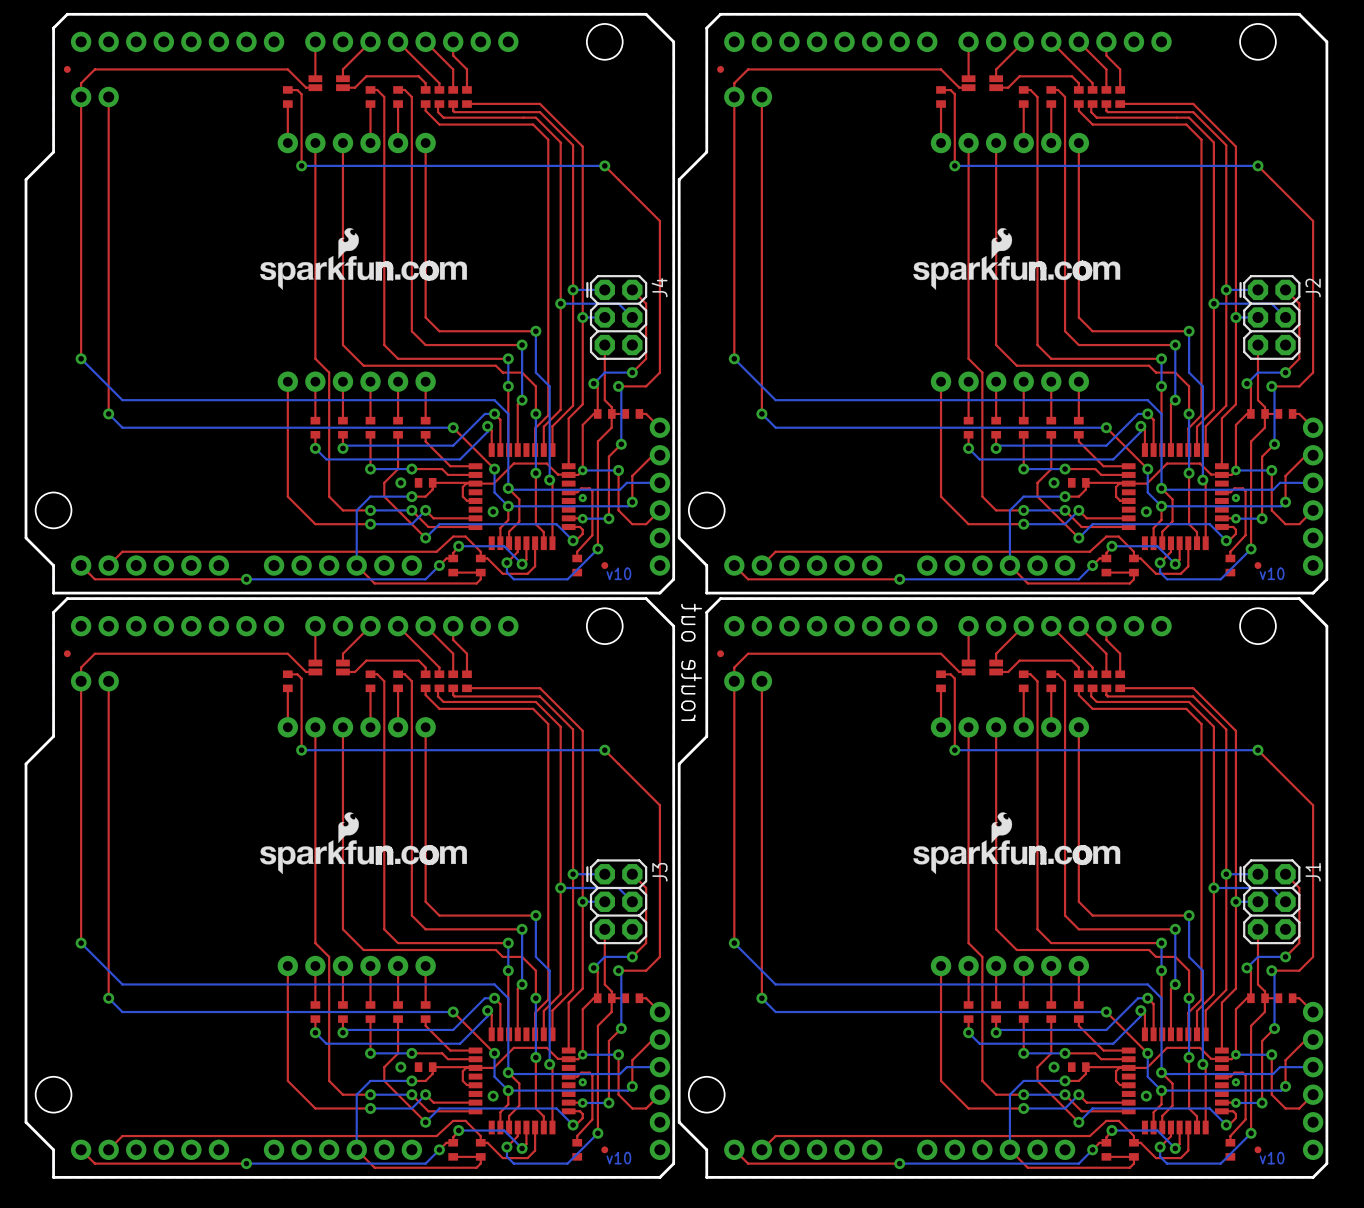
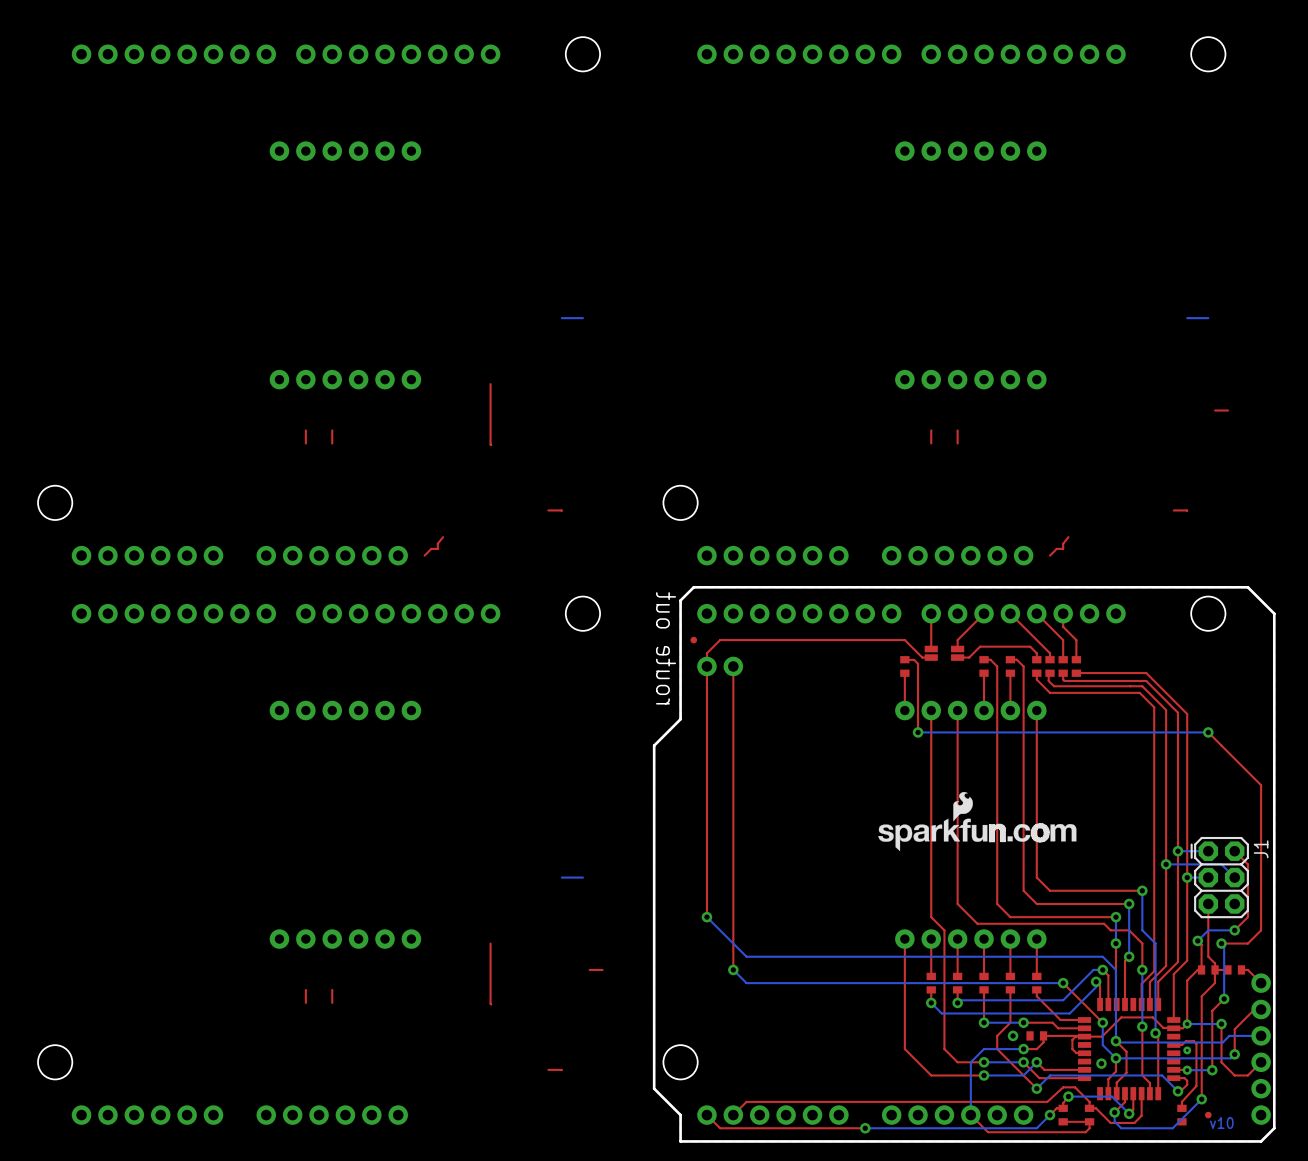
board edge: (646, 14) (67, 14) (53, 28) (53, 152) (26, 179) (26, 537) (53, 565) (53, 593) (659, 593) (673, 579) (673, 41) (646, 14) -> none
board edge: (1299, 14) (1326, 41) (1326, 579) (1313, 593) (706, 593) (706, 565) (679, 537) (679, 179) (706, 152) (706, 28) (720, 14) (1299, 14) -> none
top track: (315, 41) (315, 78) -> none
top track: (370, 41) (342, 69) (342, 78) -> none
top track: (398, 41) (439, 83) (439, 89) -> none
top track: (425, 41) (453, 69) (453, 89) -> none
top track: (453, 41) (453, 55) (466, 69) (466, 89) -> none
top track: (968, 41) (968, 78) -> none
top track: (1023, 41) (996, 69) (996, 78) -> none
top track: (1051, 41) (1092, 83) (1092, 89) -> none
top track: (1078, 41) (1106, 69) (1106, 89) -> none
top track: (1106, 41) (1106, 55) (1120, 69) (1120, 89) -> none
part: (67, 69) -> none
part: (720, 69) -> none
part: (315, 83) -> none
part: (342, 83) -> none
part: (968, 83) -> none
part: (996, 83) -> none
top track: (315, 87) (306, 87) (287, 69) (94, 69) (81, 83) (81, 358) -> none
top track: (342, 87) (355, 87) (366, 76) (418, 76) (425, 83) (425, 89) -> none
top track: (968, 87) (959, 87) (941, 69) (748, 69) (734, 83) (734, 358) -> none
top track: (996, 87) (1008, 87) (1019, 76) (1071, 76) (1078, 83) (1078, 89) -> none
top track: (287, 89) (297, 90) (301, 94) (301, 165) -> none
top track: (370, 89) (377, 89) (384, 96) (384, 345) (398, 358) (508, 358) -> none
top track: (398, 89) (404, 89) (411, 96) (411, 331) (425, 345) (522, 345) -> none
top track: (941, 89) (950, 90) (954, 94) (954, 165) -> none
top track: (1023, 89) (1030, 89) (1037, 96) (1037, 345) (1051, 358) (1161, 358) -> none
top track: (1051, 89) (1058, 89) (1065, 96) (1065, 331) (1078, 345) (1175, 345) -> none
part: (94, 96) -> none
top track: (108, 96) (108, 413) -> none
part: (287, 96) -> none
part: (370, 96) -> none
part: (398, 96) -> none
part: (425, 96) -> none
part: (439, 96) -> none
part: (453, 96) -> none
part: (466, 96) -> none
part: (748, 96) -> none
top track: (761, 96) (761, 413) -> none
part: (941, 96) -> none
part: (1023, 96) -> none
part: (1051, 96) -> none
part: (1078, 96) -> none
part: (1092, 96) -> none
part: (1106, 96) -> none
part: (1120, 96) -> none
top track: (287, 104) (287, 143) -> none
top track: (370, 104) (370, 143) -> none
top track: (398, 104) (398, 143) -> none
top track: (425, 104) (425, 110) (439, 124) (533, 124) (548, 139) (548, 415) (535, 428) (535, 450) -> none
top track: (439, 104) (438, 112) (443, 117) (535, 117) (560, 142) (560, 409) (543, 426) (543, 450) -> none
top track: (453, 104) (454, 112) (540, 112) (573, 145) (573, 405) (552, 426) (552, 450) -> none
top track: (466, 104) (540, 103) (582, 146) (582, 404) (568, 418) (568, 466) -> none
top track: (941, 104) (941, 143) -> none
top track: (1023, 104) (1023, 143) -> none
top track: (1051, 104) (1051, 143) -> none
top track: (1078, 104) (1078, 110) (1092, 124) (1186, 124) (1201, 139) (1201, 415) (1188, 428) (1188, 450) -> none
top track: (1092, 104) (1091, 112) (1096, 117) (1189, 117) (1213, 142) (1213, 409) (1197, 426) (1197, 450) -> none
top track: (1106, 104) (1107, 112) (1193, 112) (1226, 145) (1226, 405) (1205, 426) (1205, 450) -> none
top track: (1120, 104) (1193, 103) (1235, 146) (1235, 404) (1221, 418) (1221, 466) -> none
top track: (315, 143) (315, 358) (329, 372) (329, 496) (342, 510) (370, 510) -> none
top track: (342, 143) (342, 345) (363, 365) (495, 365) (502, 372) (522, 372) (535, 386) (535, 413) -> none
top track: (425, 143) (425, 317) (439, 331) (535, 331) -> none
top track: (968, 143) (968, 358) (982, 372) (982, 496) (996, 510) (1023, 510) -> none
top track: (996, 143) (996, 345) (1016, 365) (1149, 365) (1156, 372) (1175, 372) (1189, 386) (1189, 413) -> none
top track: (1078, 143) (1078, 317) (1092, 331) (1189, 331) -> none
via: (301, 165) -> none
top track: (604, 165) (659, 221) (659, 372) (646, 386) (618, 386) -> none
bottom track: (604, 165) (301, 165) -> none
via: (604, 165) -> none
via: (954, 165) -> none
top track: (1257, 165) (1313, 221) (1313, 372) (1299, 386) (1271, 386) -> none
bottom track: (1257, 165) (954, 165) -> none
via: (1257, 165) -> none
drawing: [260, 228, 467, 290] -> none
drawing: [913, 228, 1121, 290] -> none
via: (573, 289) -> none
bottom track: (604, 289) (573, 289) -> none
top track: (632, 289) (646, 303) (646, 358) (632, 372) -> none
via: (1226, 289) -> none
bottom track: (1257, 289) (1226, 289) -> none
top track: (1285, 289) (1299, 303) (1299, 358) (1285, 372) -> none
bottom track: (560, 303) (618, 303) (632, 317) -> none
via: (560, 303) -> none
bottom track: (1213, 303) (1271, 303) (1285, 317) -> none
via: (1213, 303) -> none
via: (582, 317) -> none
J4: (616, 317) -> none
via: (1235, 317) -> none
J2: (1269, 317) -> none
bottom track: (535, 331) (535, 372) (549, 386) (549, 480) -> none
via: (535, 331) -> none
bottom track: (1189, 331) (1189, 372) (1202, 386) (1202, 480) -> none
via: (1189, 331) -> none
bottom track: (522, 345) (522, 400) -> none
via: (522, 345) -> none
top track: (604, 345) (604, 400) (611, 407) (611, 413) -> none
bottom track: (1175, 345) (1175, 400) -> none
via: (1175, 345) -> none
top track: (1257, 345) (1257, 400) (1265, 407) (1264, 427) (1251, 441) (1251, 548) -> none
bottom track: (81, 358) (122, 400) (494, 400) (508, 413) (509, 489) (619, 489) (626, 482) (659, 482) -> none
via: (81, 358) -> none
bottom track: (508, 358) (508, 386) -> none
via: (508, 358) -> none
bottom track: (734, 358) (775, 400) (1147, 400) (1161, 413) (1162, 489) (1273, 489) (1280, 482) (1313, 482) -> none
via: (734, 358) -> none
bottom track: (1161, 358) (1161, 386) -> none
via: (1161, 358) -> none
bottom track: (632, 372) (604, 372) (593, 383) -> none
via: (632, 372) -> none
bottom track: (1285, 372) (1257, 372) (1246, 383) -> none
via: (1285, 372) -> none
top track: (287, 381) (287, 496) (315, 524) (370, 524) -> none
top track: (315, 381) (315, 420) -> none
top track: (342, 381) (342, 420) -> none
top track: (370, 381) (370, 420) -> none
top track: (398, 381) (398, 420) -> none
top track: (425, 381) (425, 420) -> none
top track: (941, 381) (941, 496) (968, 524) (1023, 524) -> none
top track: (968, 381) (968, 420) -> none
top track: (996, 381) (996, 420) -> none
top track: (1023, 381) (1023, 420) -> none
top track: (1051, 381) (1051, 420) -> none
top track: (1078, 381) (1078, 420) -> none
top track: (593, 383) (597, 387) (597, 413) (593, 413) (582, 424) (582, 470) (578, 474) (557, 474) (546, 463) (513, 463) (493, 483) (466, 483) (462, 486) (462, 496) (466, 500) (475, 500) -> none
via: (593, 383) -> none
top track: (1246, 383) (1250, 387) (1250, 413) (1246, 413) (1235, 424) (1235, 470) (1231, 474) (1211, 474) (1200, 463) (1167, 463) (1146, 483) (1119, 483) (1116, 486) (1116, 496) (1120, 500) (1128, 500) -> none
via: (1246, 383) -> none
via: (508, 386) -> none
bottom track: (618, 386) (621, 389) (621, 444) -> none
via: (618, 386) -> none
top track: (1161, 386) (1162, 450) -> none
via: (1161, 386) -> none
bottom track: (1271, 386) (1274, 389) (1274, 444) -> none
via: (1271, 386) -> none
top track: (522, 400) (517, 404) (517, 450) -> none
via: (522, 400) -> none
top track: (1175, 400) (1170, 404) (1170, 450) -> none
via: (1175, 400) -> none
bottom track: (108, 413) (122, 427) (453, 427) -> none
via: (108, 413) -> none
top track: (494, 413) (500, 419) (500, 450) -> none
bottom track: (494, 413) (484, 413) (453, 445) (345, 445) (342, 448) -> none
via: (494, 413) -> none
bottom track: (535, 413) (535, 473) -> none
via: (535, 413) -> none
part: (604, 413) -> none
top track: (611, 413) (611, 427) (597, 441) (597, 548) -> none
top track: (625, 413) (611, 413) -> none
part: (632, 413) -> none
top track: (639, 413) (646, 413) (659, 427) -> none
bottom track: (761, 413) (775, 427) (1106, 427) -> none
via: (761, 413) -> none
top track: (1147, 413) (1153, 419) (1153, 450) -> none
bottom track: (1147, 413) (1138, 413) (1106, 445) (998, 445) (996, 448) -> none
via: (1147, 413) -> none
bottom track: (1189, 413) (1189, 473) -> none
via: (1189, 413) -> none
part: (1257, 413) -> none
part: (1285, 413) -> none
top track: (1292, 413) (1299, 413) (1313, 427) -> none
top track: (487, 426) (491, 430) (491, 450) -> none
bottom track: (487, 426) (487, 431) (460, 459) (326, 459) (315, 448) -> none
via: (487, 426) -> none
top track: (1140, 426) (1144, 430) (1144, 450) -> none
bottom track: (1140, 426) (1140, 431) (1113, 459) (979, 459) (968, 448) -> none
via: (1140, 426) -> none
part: (315, 427) -> none
part: (342, 427) -> none
part: (370, 427) -> none
part: (398, 427) -> none
part: (425, 427) -> none
top track: (453, 427) (494, 469) -> none
via: (453, 427) -> none
part: (968, 427) -> none
part: (996, 427) -> none
part: (1023, 427) -> none
part: (1051, 427) -> none
part: (1078, 427) -> none
top track: (1106, 427) (1147, 469) -> none
via: (1106, 427) -> none
top track: (370, 434) (370, 469) -> none
top track: (398, 434) (398, 469) (384, 482) (384, 496) (425, 537) -> none
top track: (425, 434) (425, 441) (450, 466) (475, 466) -> none
top track: (1023, 434) (1023, 469) -> none
top track: (1051, 434) (1051, 469) (1037, 482) (1037, 496) (1078, 537) -> none
top track: (1078, 434) (1078, 441) (1103, 466) (1128, 466) -> none
top track: (621, 444) (608, 456) (608, 518) -> none
via: (621, 444) -> none
top track: (1274, 444) (1262, 456) (1262, 518) -> none
via: (1274, 444) -> none
via: (315, 448) -> none
via: (342, 448) -> none
via: (968, 448) -> none
via: (996, 448) -> none
top track: (659, 455) (653, 455) (632, 475) (632, 502) -> none
top track: (1313, 455) (1306, 455) (1285, 475) (1285, 502) -> none
via: (370, 469) -> none
top track: (411, 469) (442, 469) (448, 474) (475, 474) -> none
bottom track: (411, 469) (370, 469) -> none
via: (411, 469) -> none
bottom track: (494, 469) (494, 492) (508, 506) (628, 506) (632, 502) -> none
via: (494, 469) -> none
via: (1023, 469) -> none
top track: (1065, 469) (1095, 469) (1101, 474) (1128, 474) -> none
bottom track: (1065, 469) (1023, 469) -> none
via: (1065, 469) -> none
bottom track: (1147, 469) (1147, 492) (1161, 506) (1281, 506) (1285, 502) -> none
via: (1147, 469) -> none
via: (582, 470) -> none
top track: (618, 470) (618, 510) (632, 524) (646, 524) (659, 510) -> none
bottom track: (618, 470) (582, 470) -> none
via: (618, 470) -> none
via: (1235, 470) -> none
top track: (1271, 470) (1271, 510) (1285, 524) (1299, 524) (1313, 510) -> none
bottom track: (1271, 470) (1235, 470) -> none
via: (1271, 470) -> none
top track: (535, 473) (535, 524) (543, 532) (543, 543) -> none
via: (535, 473) -> none
top track: (1189, 473) (1189, 524) (1197, 532) (1197, 543) -> none
via: (1189, 473) -> none
top track: (549, 480) (552, 482) (552, 543) -> none
via: (549, 480) -> none
top track: (1202, 480) (1205, 482) (1205, 543) -> none
via: (1202, 480) -> none
via: (400, 482) -> none
part: (425, 482) -> none
via: (1054, 482) -> none
part: (1078, 482) -> none
top track: (475, 483) (432, 482) (432, 489) (425, 496) (411, 496) -> none
top track: (1128, 483) (1085, 482) (1085, 489) (1078, 496) (1065, 496) -> none
top track: (508, 488) (519, 499) (519, 521) (509, 531) (509, 543) -> none
via: (508, 488) -> none
top track: (1161, 488) (1172, 499) (1172, 521) (1162, 531) (1162, 543) -> none
via: (1161, 488) -> none
top track: (568, 492) (577, 492) (581, 488) (589, 488) (592, 491) (592, 535) (577, 551) (577, 558) -> none
top track: (1221, 492) (1230, 492) (1234, 488) (1242, 488) (1245, 491) (1245, 535) (1230, 551) (1230, 558) -> none
bottom track: (411, 496) (370, 496) (356, 510) (356, 565) -> none
via: (411, 496) -> none
part: (522, 496) -> none
part: (659, 496) -> none
bottom track: (1065, 496) (1023, 496) (1009, 510) (1009, 565) -> none
via: (1065, 496) -> none
part: (1175, 496) -> none
part: (1313, 496) -> none
via: (582, 498) -> none
via: (1235, 498) -> none
via: (632, 502) -> none
via: (1285, 502) -> none
top track: (508, 506) (508, 520) (500, 527) (500, 543) -> none
via: (508, 506) -> none
top track: (1161, 506) (1161, 520) (1153, 527) (1153, 543) -> none
via: (1161, 506) -> none
via: (370, 510) -> none
top track: (411, 510) (428, 527) (475, 527) -> none
bottom track: (411, 510) (370, 510) -> none
via: (411, 510) -> none
top track: (425, 510) (433, 518) (475, 518) -> none
bottom track: (425, 510) (411, 524) (370, 524) -> none
via: (425, 510) -> none
via: (1023, 510) -> none
top track: (1065, 510) (1081, 527) (1128, 527) -> none
bottom track: (1065, 510) (1023, 510) -> none
via: (1065, 510) -> none
top track: (1078, 510) (1086, 518) (1128, 518) -> none
bottom track: (1078, 510) (1065, 524) (1023, 524) -> none
via: (1078, 510) -> none
via: (493, 511) -> none
via: (1146, 511) -> none
via: (582, 518) -> none
bottom track: (608, 518) (582, 518) -> none
via: (608, 518) -> none
via: (1235, 518) -> none
bottom track: (1262, 518) (1235, 518) -> none
via: (1262, 518) -> none
via: (370, 524) -> none
via: (1023, 524) -> none
top track: (568, 526) (579, 526) (582, 529) (582, 533) (575, 540) (573, 540) -> none
top track: (1221, 526) (1233, 526) (1235, 529) (1235, 533) (1229, 540) (1226, 540) -> none
bottom track: (425, 537) (439, 524) (556, 524) (573, 540) -> none
via: (425, 537) -> none
bottom track: (1078, 537) (1092, 524) (1209, 524) (1226, 540) -> none
via: (1078, 537) -> none
via: (573, 540) -> none
via: (1226, 540) -> none
top track: (517, 543) (517, 551) (506, 562) -> none
top track: (526, 543) (526, 559) (522, 564) -> none
top track: (535, 543) (535, 566) (527, 573) (502, 573) (487, 558) (480, 558) (480, 551) (465, 536) (453, 536) (436, 551) (122, 551) (108, 565) -> none
top track: (1170, 543) (1170, 551) (1160, 562) -> none
top track: (1179, 543) (1179, 559) (1175, 564) -> none
top track: (1188, 543) (1188, 566) (1180, 573) (1156, 573) (1140, 558) (1133, 558) (1133, 551) (1118, 536) (1106, 536) (1089, 551) (775, 551) (761, 565) -> none
bottom track: (458, 546) (504, 546) (522, 564) -> none
via: (458, 546) -> none
bottom track: (1111, 546) (1157, 546) (1175, 564) -> none
via: (1111, 546) -> none
bottom track: (597, 548) (567, 579) (513, 579) (506, 572) (506, 562) -> none
via: (597, 548) -> none
bottom track: (1251, 548) (1220, 579) (1167, 579) (1160, 572) (1160, 562) -> none
via: (1251, 548) -> none
via: (506, 562) -> none
via: (1160, 562) -> none
via: (522, 564) -> none
via: (1175, 564) -> none
top track: (81, 565) (94, 579) (246, 579) -> none
top track: (356, 565) (374, 583) (476, 583) (480, 579) (480, 572) (453, 572) -> none
bottom track: (439, 565) (425, 579) (246, 579) -> none
via: (439, 565) -> none
part: (453, 565) -> none
part: (480, 565) -> none
part: (577, 565) -> none
part: (604, 565) -> none
top track: (734, 565) (748, 579) (899, 579) -> none
top track: (1009, 565) (1027, 583) (1129, 583) (1133, 579) (1133, 572) (1106, 572) -> none
bottom track: (1092, 565) (1078, 579) (899, 579) -> none
via: (1092, 565) -> none
part: (1106, 565) -> none
part: (1133, 565) -> none
part: (1230, 565) -> none
part: (1257, 565) -> none
text: v10 (618, 573) -> none
text: v10 (1272, 573) -> none
via: (246, 579) -> none
via: (899, 579) -> none
board edge: (646, 598) (67, 598) (53, 612) (53, 736) (26, 763) (26, 1122) (53, 1149) (53, 1177) (659, 1177) (673, 1163) (673, 626) (646, 598) -> none
top track: (315, 626) (315, 663) -> none
top track: (370, 626) (342, 653) (342, 663) -> none
top track: (398, 626) (439, 667) (439, 674) -> none
top track: (425, 626) (453, 653) (453, 674) -> none
top track: (453, 626) (453, 639) (466, 653) (466, 674) -> none
part: (67, 653) -> none
part: (315, 667) -> none
part: (342, 667) -> none
top track: (315, 671) (306, 671) (287, 653) (94, 653) (81, 667) (81, 943) -> none
top track: (342, 671) (355, 671) (366, 660) (418, 660) (425, 667) (425, 674) -> none
top track: (287, 674) (297, 674) (301, 678) (301, 750) -> none
top track: (370, 674) (377, 674) (384, 681) (384, 929) (398, 943) (508, 943) -> none
top track: (398, 674) (404, 674) (411, 681) (411, 915) (425, 929) (522, 929) -> none
part: (94, 681) -> none
top track: (108, 681) (108, 998) -> none
part: (287, 681) -> none
part: (370, 681) -> none
part: (398, 681) -> none
part: (425, 681) -> none
part: (439, 681) -> none
part: (453, 681) -> none
part: (466, 681) -> none
top track: (287, 688) (287, 727) -> none
top track: (370, 688) (370, 727) -> none
top track: (398, 688) (398, 727) -> none
top track: (425, 688) (425, 695) (439, 708) (533, 708) (548, 724) (548, 999) (535, 1012) (535, 1034) -> none
top track: (439, 688) (438, 696) (443, 701) (535, 701) (560, 726) (560, 994) (543, 1010) (543, 1034) -> none
top track: (453, 688) (454, 696) (540, 696) (573, 729) (573, 989) (552, 1010) (552, 1034) -> none
top track: (466, 688) (540, 688) (582, 730) (582, 988) (568, 1002) (568, 1050) -> none
top track: (315, 727) (315, 943) (329, 956) (329, 1080) (342, 1094) (370, 1094) -> none
top track: (342, 727) (342, 929) (363, 950) (495, 950) (502, 956) (522, 956) (535, 970) (535, 998) -> none
top track: (425, 727) (425, 901) (439, 915) (535, 915) -> none
via: (301, 750) -> none
top track: (604, 750) (659, 805) (659, 956) (646, 970) (618, 970) -> none
bottom track: (604, 750) (301, 750) -> none
via: (604, 750) -> none
drawing: [260, 812, 467, 875] -> none
via: (573, 874) -> none
bottom track: (604, 874) (573, 874) -> none
top track: (632, 874) (646, 888) (646, 943) (632, 956) -> none
bottom track: (560, 888) (618, 888) (632, 901) -> none
via: (560, 888) -> none
via: (582, 901) -> none
J3: (616, 901) -> none
bottom track: (535, 915) (535, 956) (549, 970) (549, 1064) -> none
via: (535, 915) -> none
bottom track: (522, 929) (522, 984) -> none
via: (522, 929) -> none
top track: (604, 929) (604, 984) (611, 991) (611, 1012) (597, 1025) (597, 1133) -> none
bottom track: (81, 943) (122, 984) (494, 984) (508, 998) (509, 1074) (619, 1074) (626, 1067) (659, 1067) -> none
via: (81, 943) -> none
bottom track: (508, 943) (508, 970) -> none
via: (508, 943) -> none
bottom track: (632, 956) (604, 956) (593, 967) -> none
via: (632, 956) -> none
top track: (287, 965) (287, 1080) (315, 1108) (370, 1108) -> none
top track: (315, 965) (315, 1004) -> none
top track: (342, 965) (342, 1004) -> none
top track: (370, 965) (370, 1004) -> none
top track: (398, 965) (398, 1004) -> none
top track: (425, 965) (425, 1004) -> none
top track: (593, 967) (597, 971) (597, 998) (593, 998) (582, 1009) (582, 1054) (578, 1059) (557, 1058) (546, 1047) (513, 1047) (493, 1067) (466, 1067) (462, 1071) (462, 1080) (466, 1085) (475, 1085) -> none
via: (593, 967) -> none
via: (508, 970) -> none
bottom track: (618, 970) (621, 973) (621, 1028) -> none
via: (618, 970) -> none
top track: (522, 984) (517, 988) (517, 1034) -> none
via: (522, 984) -> none
bottom track: (108, 998) (122, 1012) (453, 1012) -> none
via: (108, 998) -> none
top track: (494, 998) (500, 1004) (500, 1034) -> none
bottom track: (494, 998) (484, 998) (453, 1029) (345, 1029) (342, 1032) -> none
via: (494, 998) -> none
bottom track: (535, 998) (535, 1057) -> none
via: (535, 998) -> none
part: (604, 998) -> none
part: (632, 998) -> none
top track: (639, 998) (646, 998) (659, 1012) -> none
top track: (487, 1010) (491, 1014) (491, 1034) -> none
bottom track: (487, 1010) (487, 1016) (460, 1043) (326, 1043) (315, 1032) -> none
via: (487, 1010) -> none
part: (315, 1012) -> none
part: (342, 1012) -> none
part: (370, 1012) -> none
part: (398, 1012) -> none
part: (425, 1012) -> none
top track: (453, 1012) (494, 1053) -> none
via: (453, 1012) -> none
top track: (370, 1019) (370, 1053) -> none
top track: (398, 1019) (398, 1053) (384, 1067) (384, 1080) (425, 1122) -> none
top track: (425, 1019) (425, 1025) (450, 1050) (475, 1050) -> none
top track: (621, 1028) (608, 1040) (608, 1102) -> none
via: (621, 1028) -> none
via: (315, 1032) -> none
via: (342, 1032) -> none
top track: (659, 1039) (653, 1039) (632, 1060) (632, 1086) -> none
via: (370, 1053) -> none
top track: (411, 1053) (442, 1053) (448, 1059) (475, 1059) -> none
bottom track: (411, 1053) (370, 1053) -> none
via: (411, 1053) -> none
bottom track: (494, 1053) (494, 1076) (508, 1090) (628, 1090) (632, 1086) -> none
via: (494, 1053) -> none
via: (582, 1054) -> none
top track: (618, 1054) (618, 1094) (632, 1108) (646, 1108) (659, 1094) -> none
bottom track: (618, 1054) (582, 1054) -> none
via: (618, 1054) -> none
top track: (535, 1057) (535, 1108) (543, 1116) (543, 1127) -> none
via: (535, 1057) -> none
top track: (549, 1064) (552, 1067) (552, 1127) -> none
via: (549, 1064) -> none
via: (400, 1067) -> none
part: (425, 1067) -> none
top track: (475, 1067) (432, 1067) (432, 1073) (425, 1080) (411, 1080) -> none
top track: (508, 1072) (519, 1083) (519, 1105) (509, 1115) (509, 1127) -> none
via: (508, 1072) -> none
top track: (568, 1076) (577, 1076) (581, 1072) (589, 1072) (592, 1075) (592, 1119) (577, 1136) (577, 1142) -> none
bottom track: (411, 1080) (370, 1080) (356, 1094) (356, 1149) -> none
via: (411, 1080) -> none
part: (522, 1080) -> none
part: (659, 1080) -> none
via: (582, 1082) -> none
via: (632, 1086) -> none
top track: (508, 1090) (508, 1104) (500, 1112) (500, 1127) -> none
via: (508, 1090) -> none
via: (370, 1094) -> none
top track: (411, 1094) (428, 1111) (475, 1111) -> none
bottom track: (411, 1094) (370, 1094) -> none
via: (411, 1094) -> none
top track: (425, 1094) (433, 1102) (475, 1102) -> none
bottom track: (425, 1094) (411, 1108) (370, 1108) -> none
via: (425, 1094) -> none
via: (493, 1096) -> none
via: (582, 1102) -> none
bottom track: (608, 1102) (582, 1102) -> none
via: (608, 1102) -> none
via: (370, 1108) -> none
top track: (568, 1111) (579, 1111) (582, 1114) (582, 1118) (575, 1125) (573, 1125) -> none
bottom track: (425, 1122) (439, 1108) (556, 1108) (573, 1125) -> none
via: (425, 1122) -> none
via: (573, 1125) -> none
top track: (517, 1127) (517, 1136) (506, 1147) -> none
top track: (526, 1127) (526, 1144) (522, 1148) -> none
top track: (535, 1127) (535, 1150) (527, 1158) (502, 1158) (487, 1142) (480, 1142) (480, 1136) (465, 1120) (453, 1120) (436, 1136) (122, 1136) (108, 1149) -> none
top track: (458, 1130) (453, 1137) (453, 1142) (446, 1142) (439, 1149) -> none
bottom track: (458, 1130) (504, 1130) (522, 1148) -> none
via: (458, 1130) -> none
bottom track: (597, 1133) (567, 1163) (513, 1163) (506, 1156) (506, 1147) -> none
via: (597, 1133) -> none
via: (506, 1147) -> none
via: (522, 1148) -> none
top track: (81, 1149) (94, 1163) (246, 1163) -> none
top track: (356, 1149) (374, 1167) (476, 1167) (480, 1163) (480, 1156) (453, 1156) -> none
bottom track: (439, 1149) (425, 1163) (246, 1163) -> none
via: (439, 1149) -> none
part: (453, 1149) -> none
part: (480, 1149) -> none
part: (577, 1149) -> none
part: (604, 1149) -> none
text: v10 (618, 1158) -> none
via: (246, 1163) -> none

